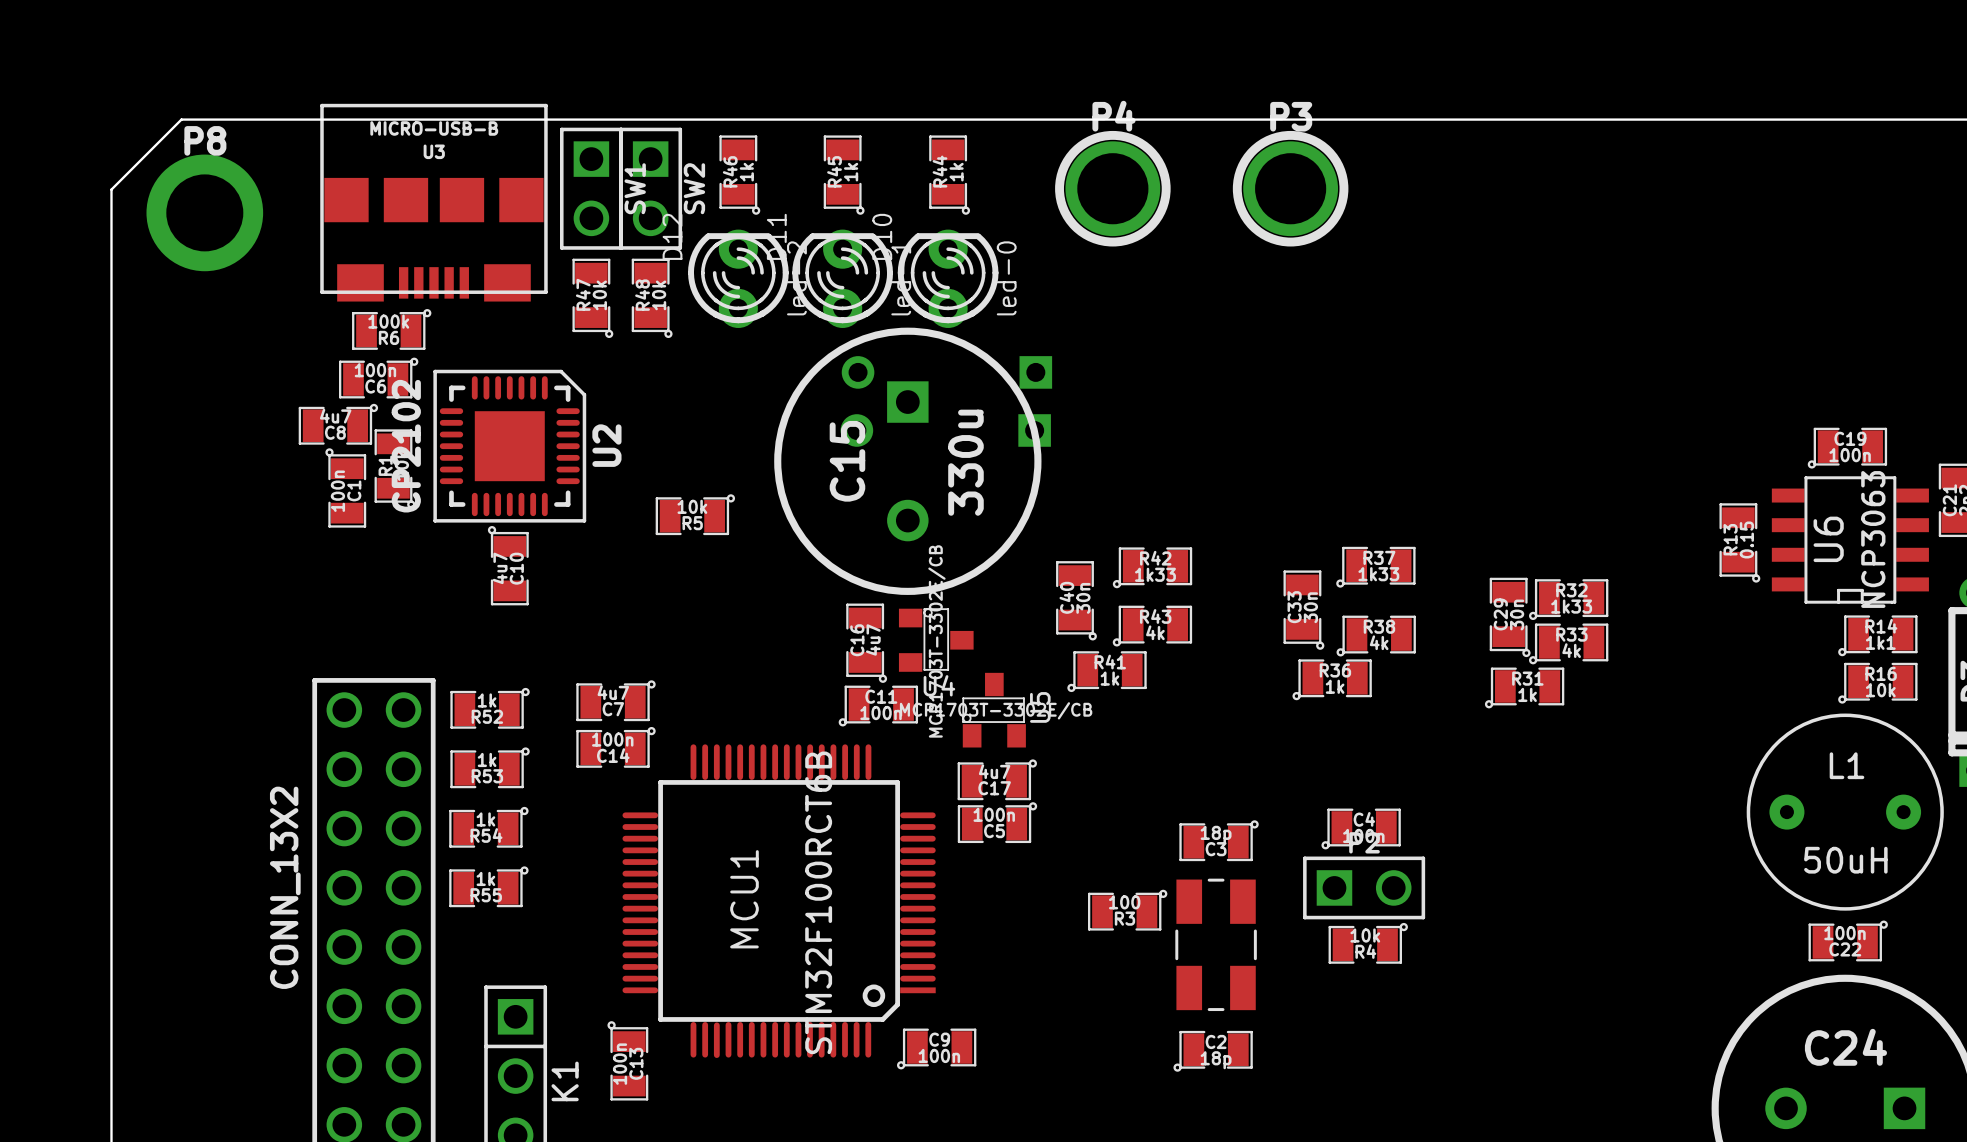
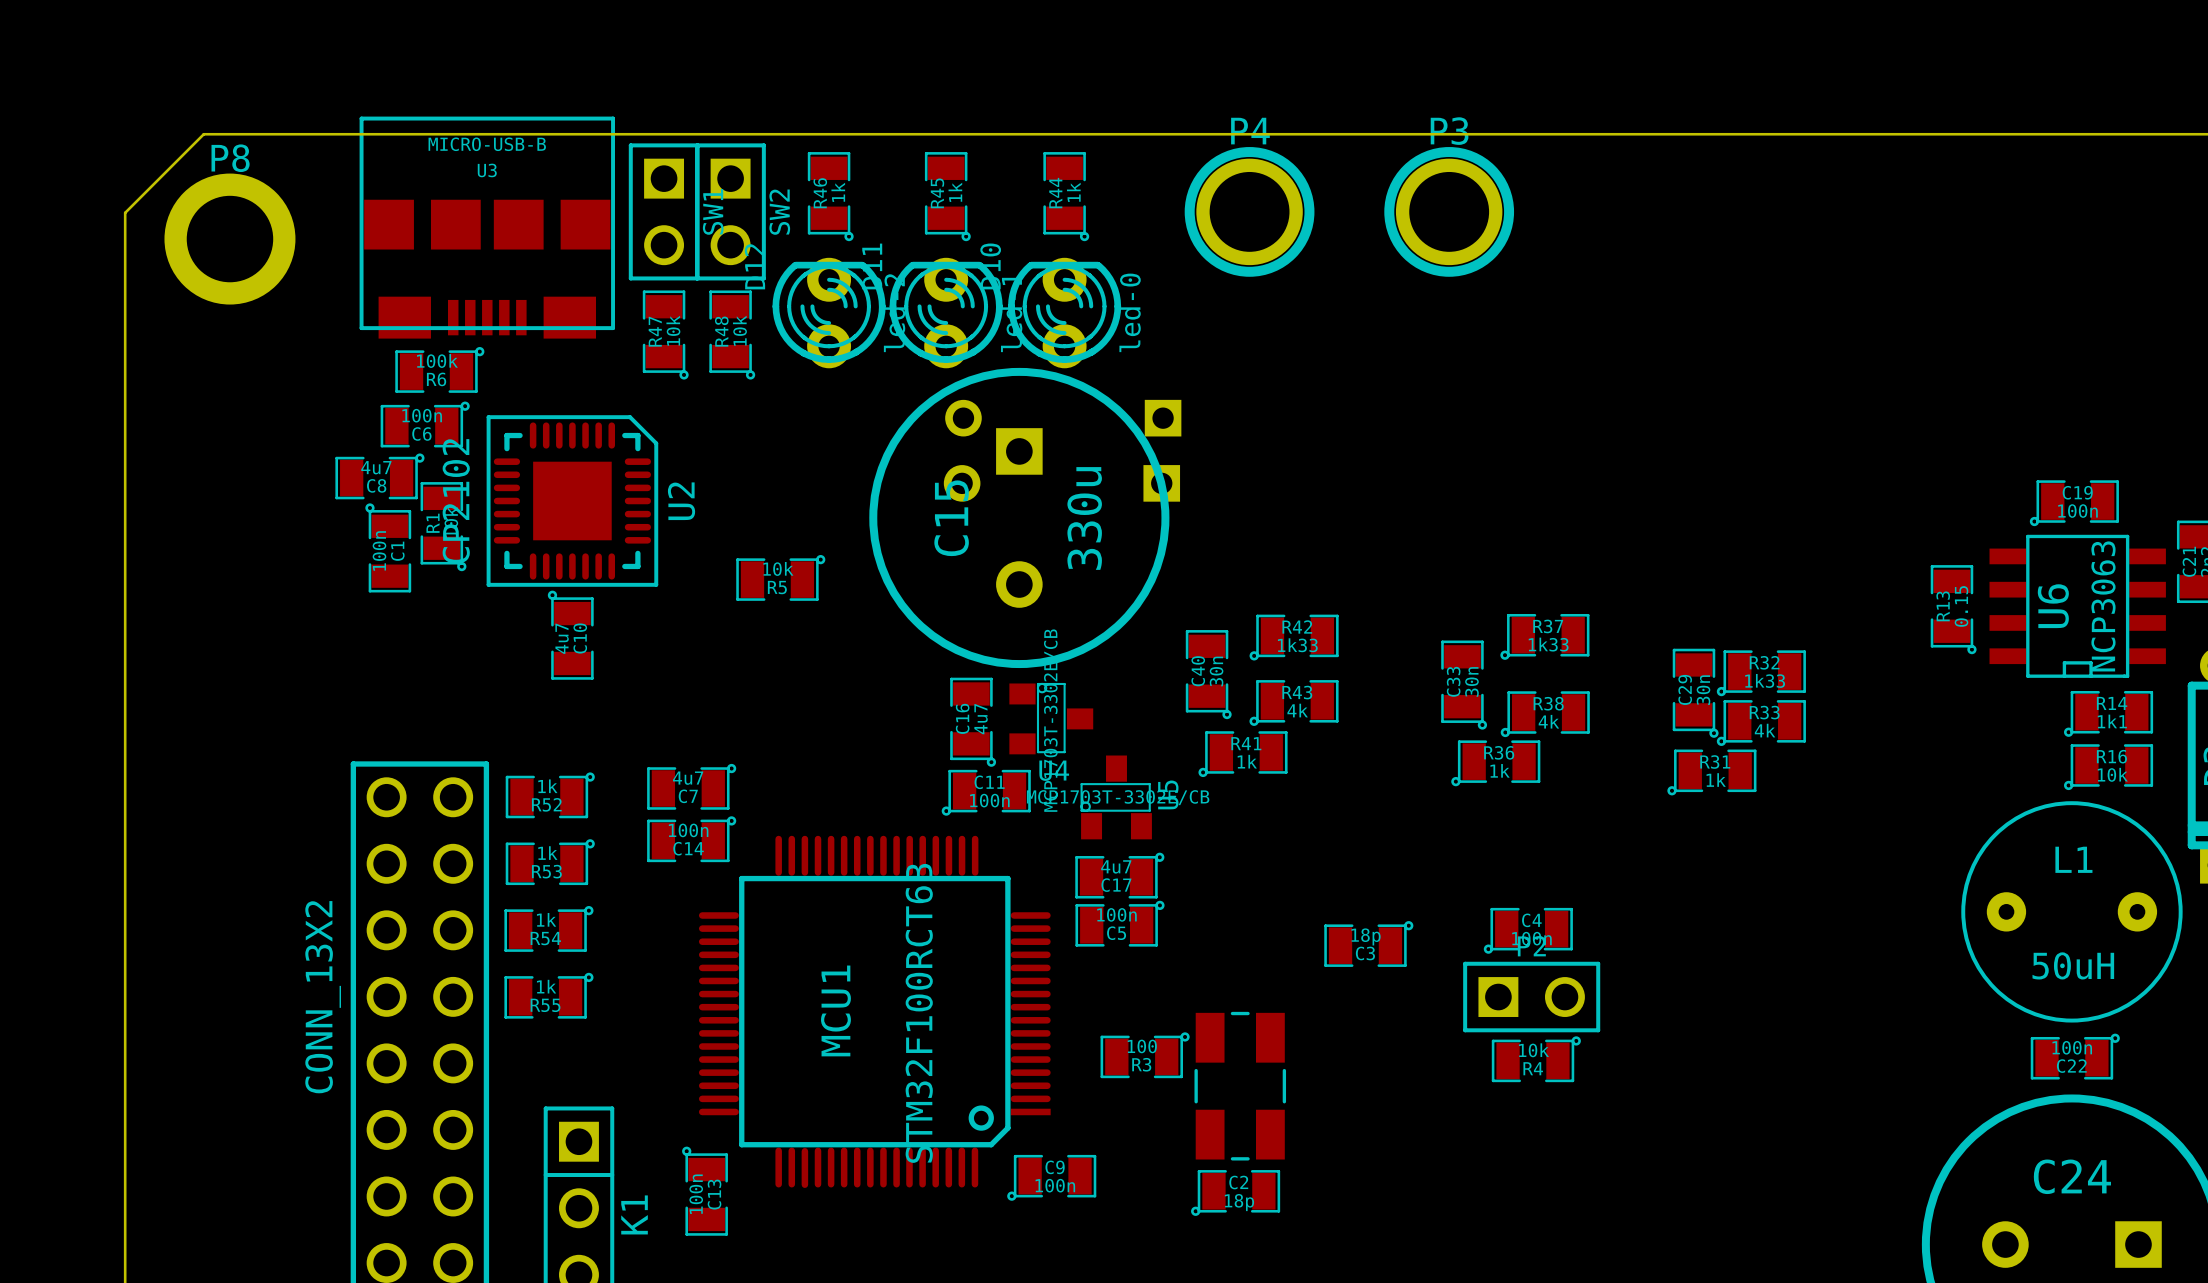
R3 position: (1127, 910) -> (1145, 1055)
part position: (1216, 944) -> (1240, 1086)
C2 position: (1213, 1051) -> (1235, 1192)

